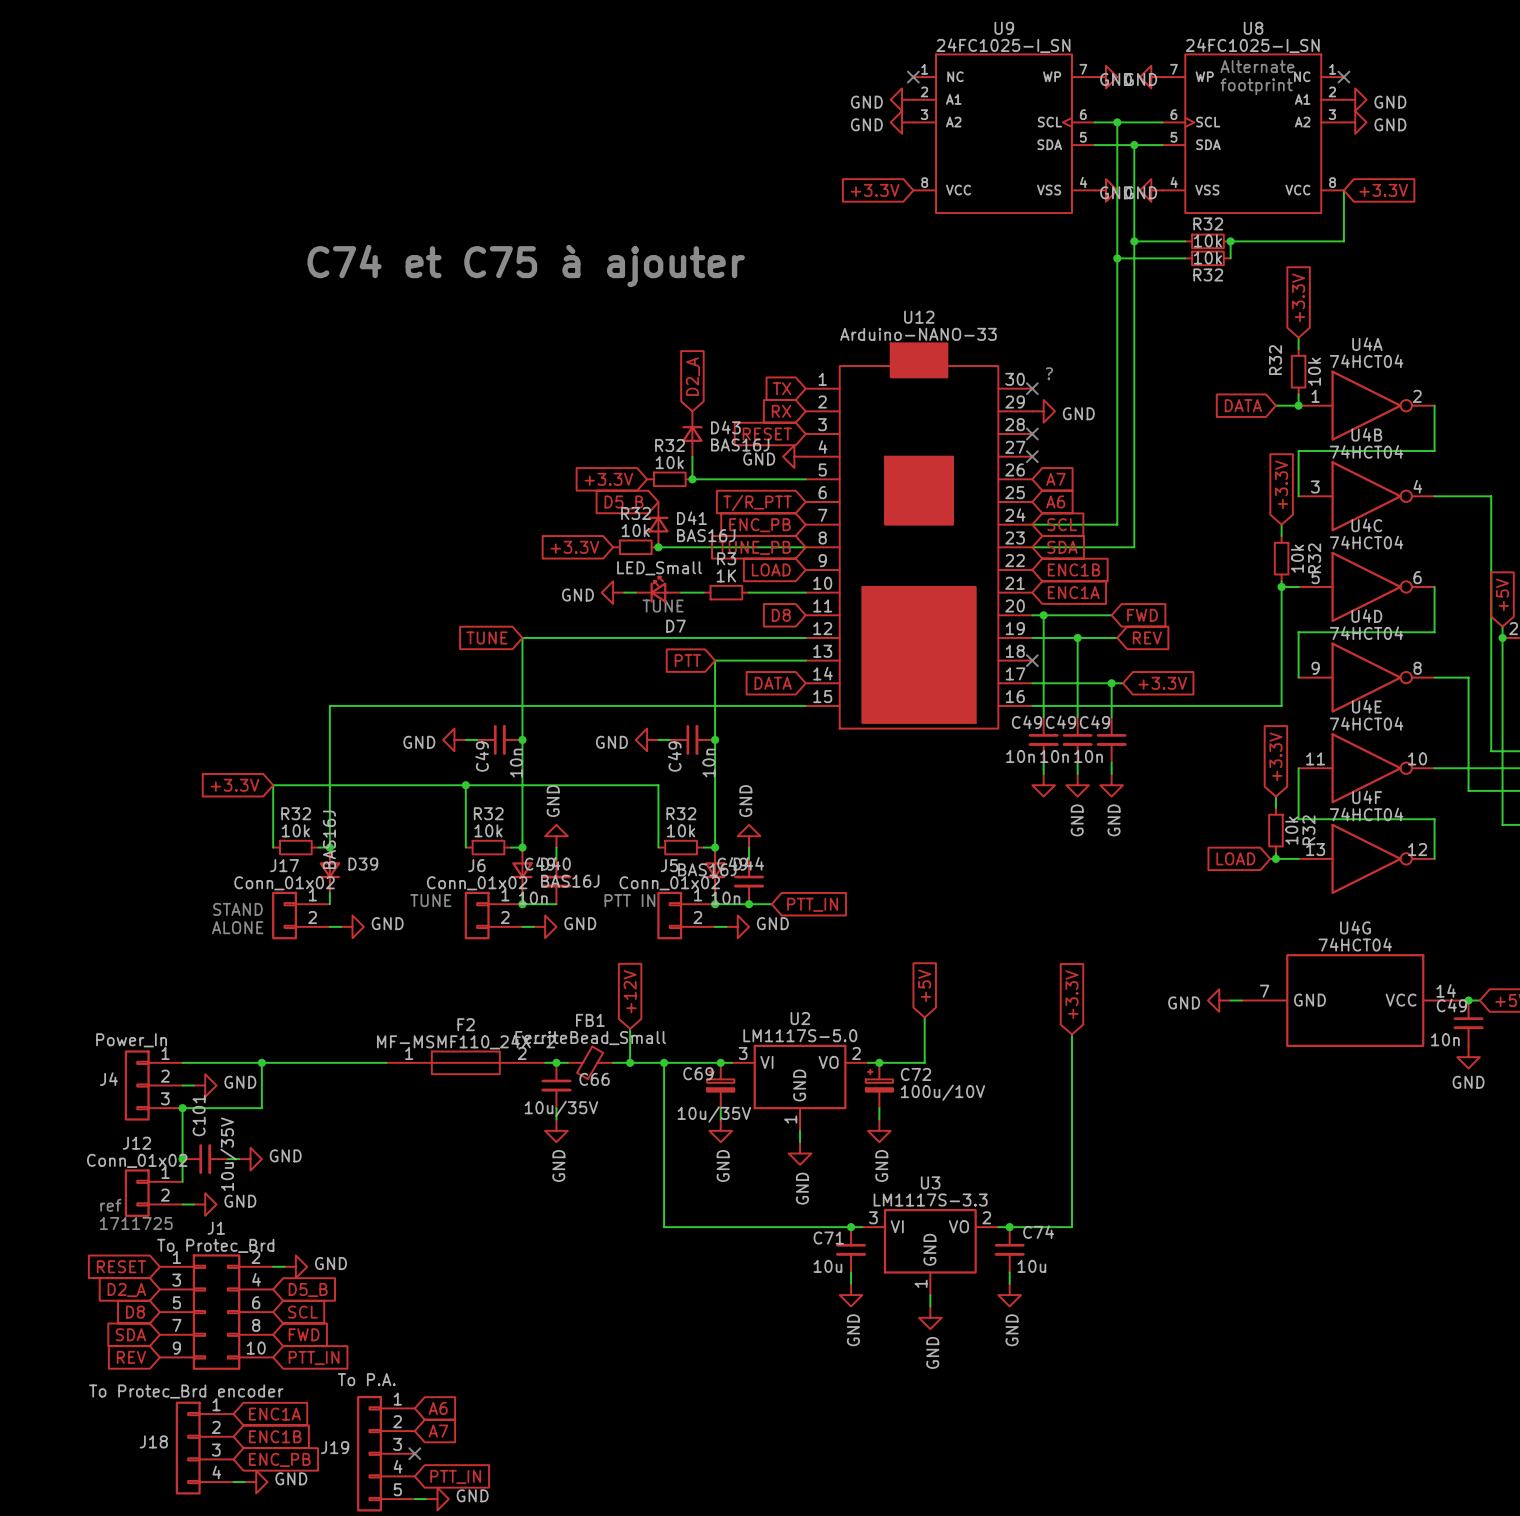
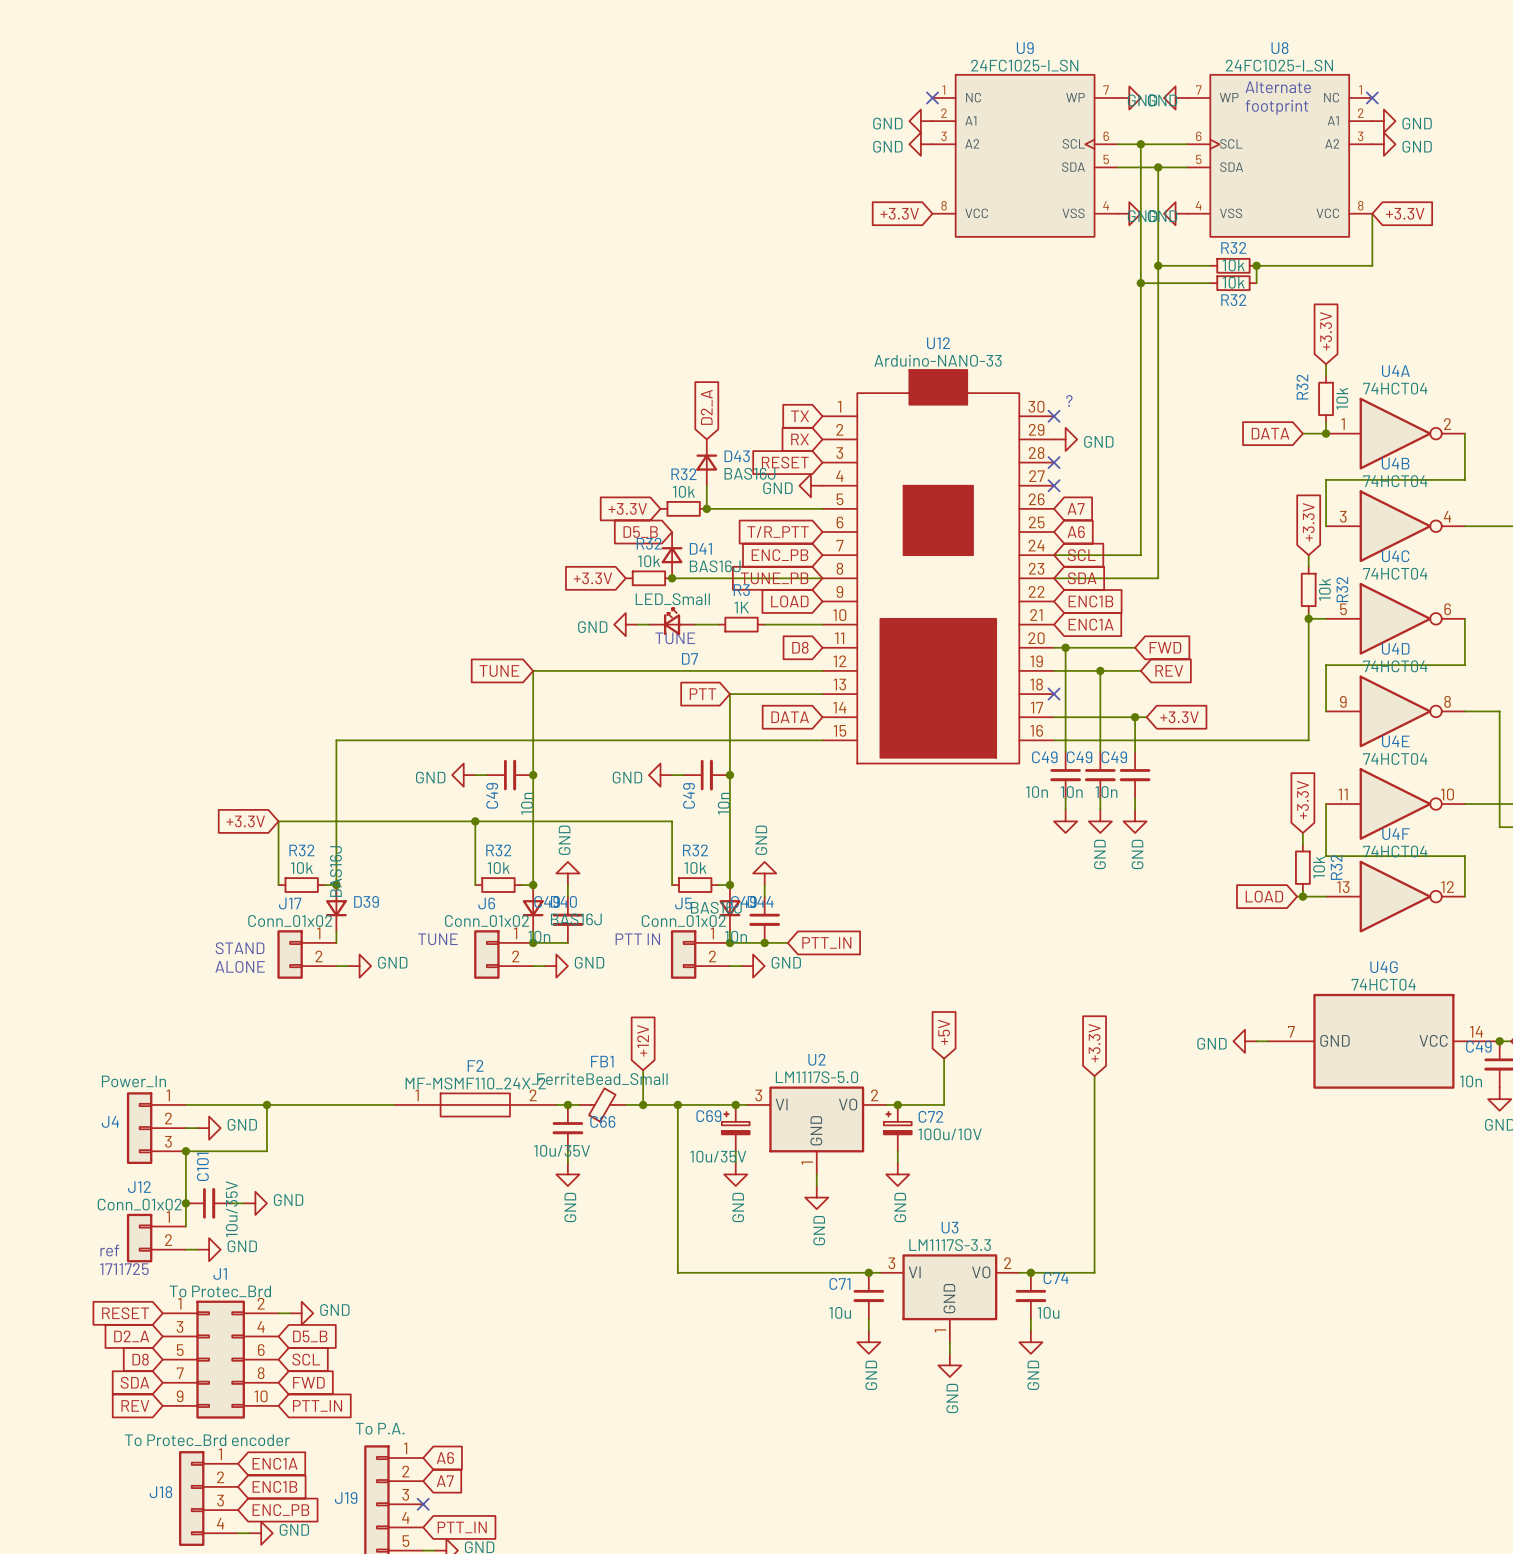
text: C74 et C75 à ajouter (526, 265) -> none

